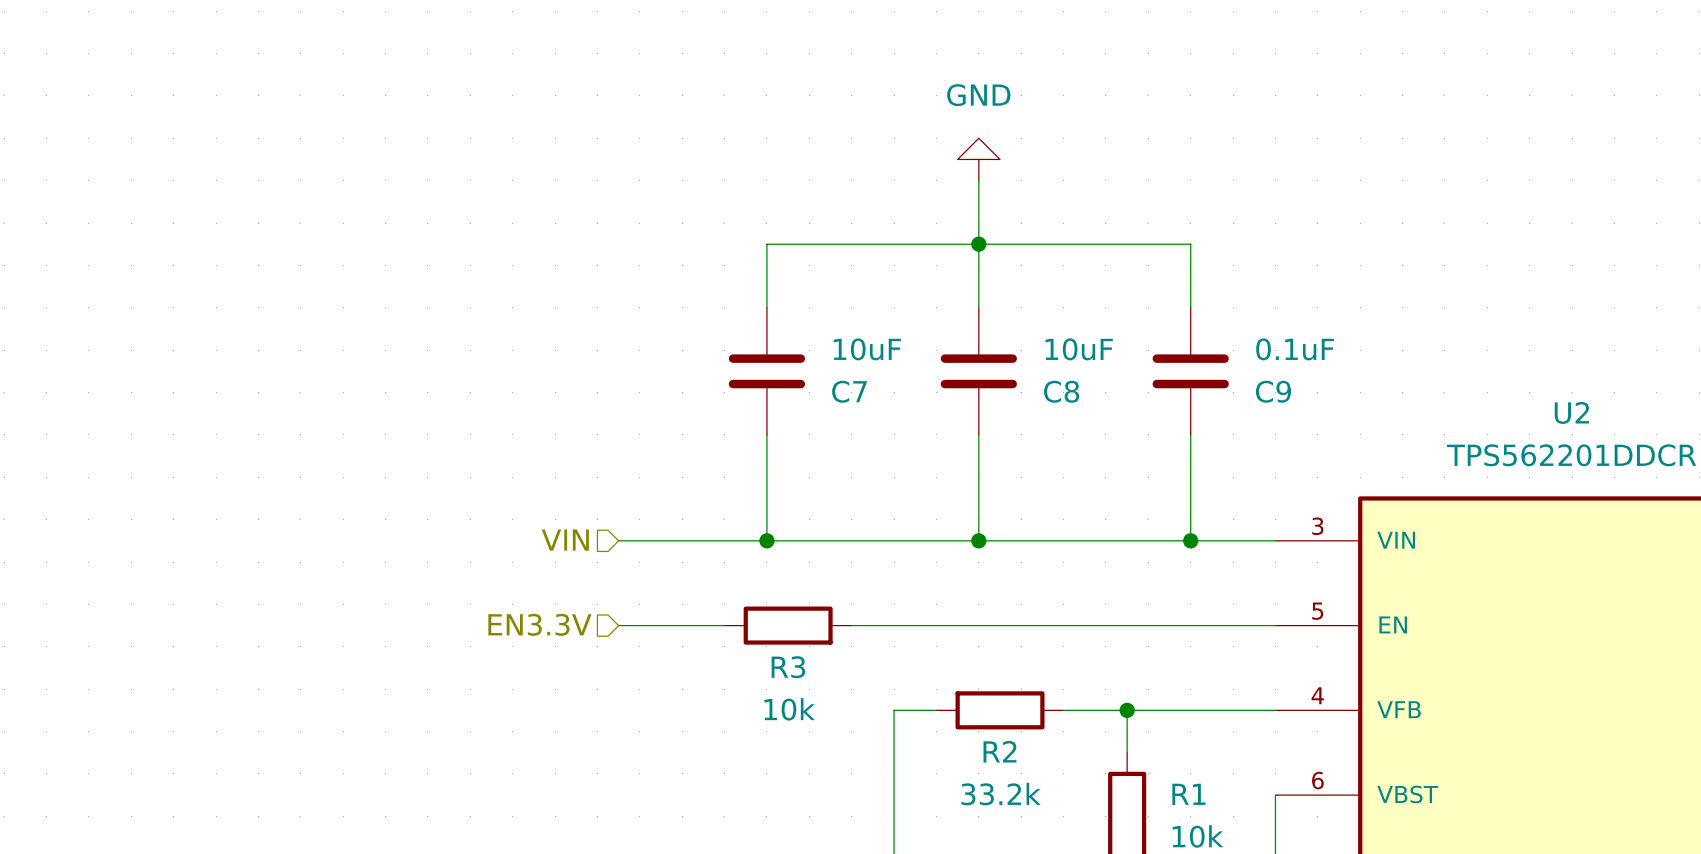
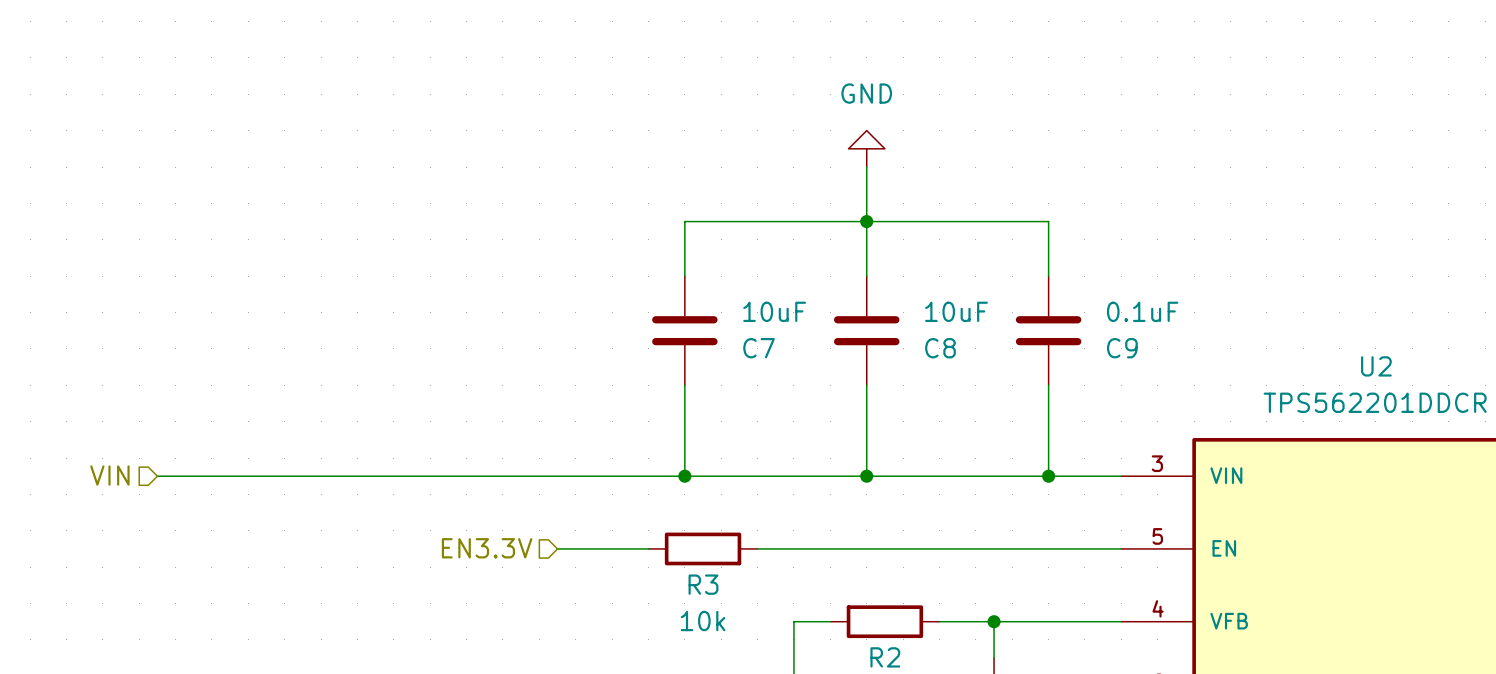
hierarchical label: none -> VIN (109, 475)
wire: none -> (157, 476) (557, 476)
hierarchical label: VIN (565, 540) -> none

